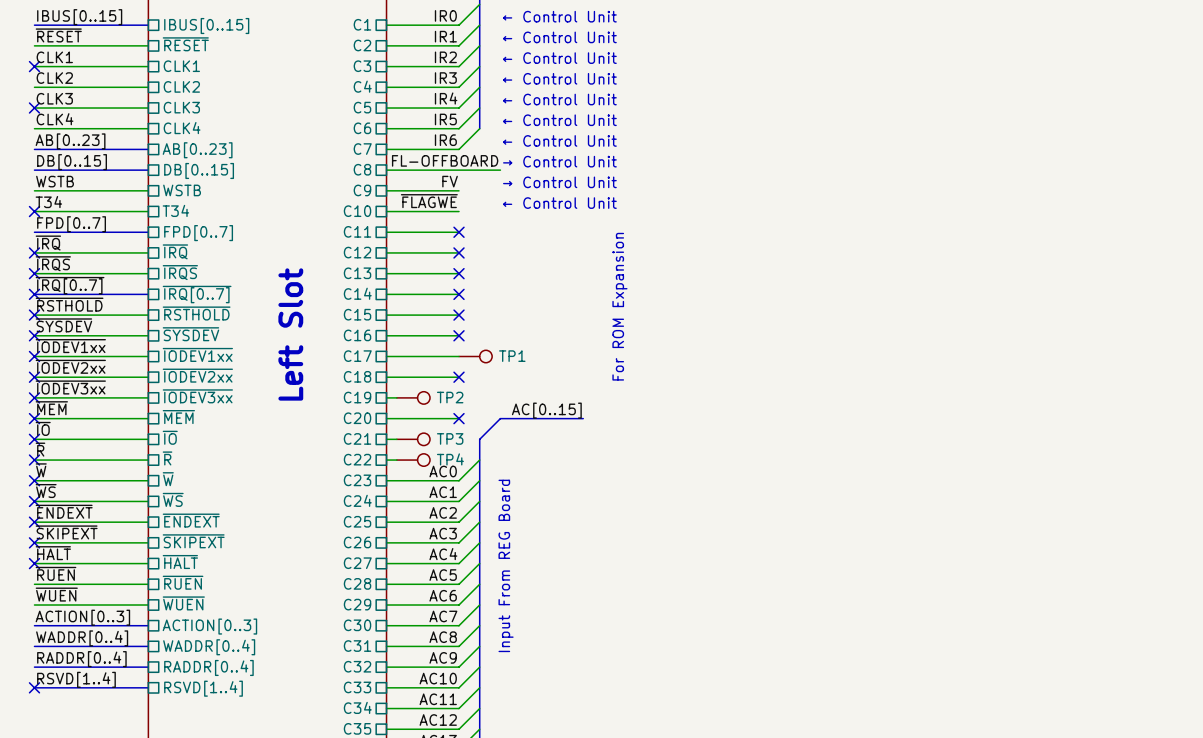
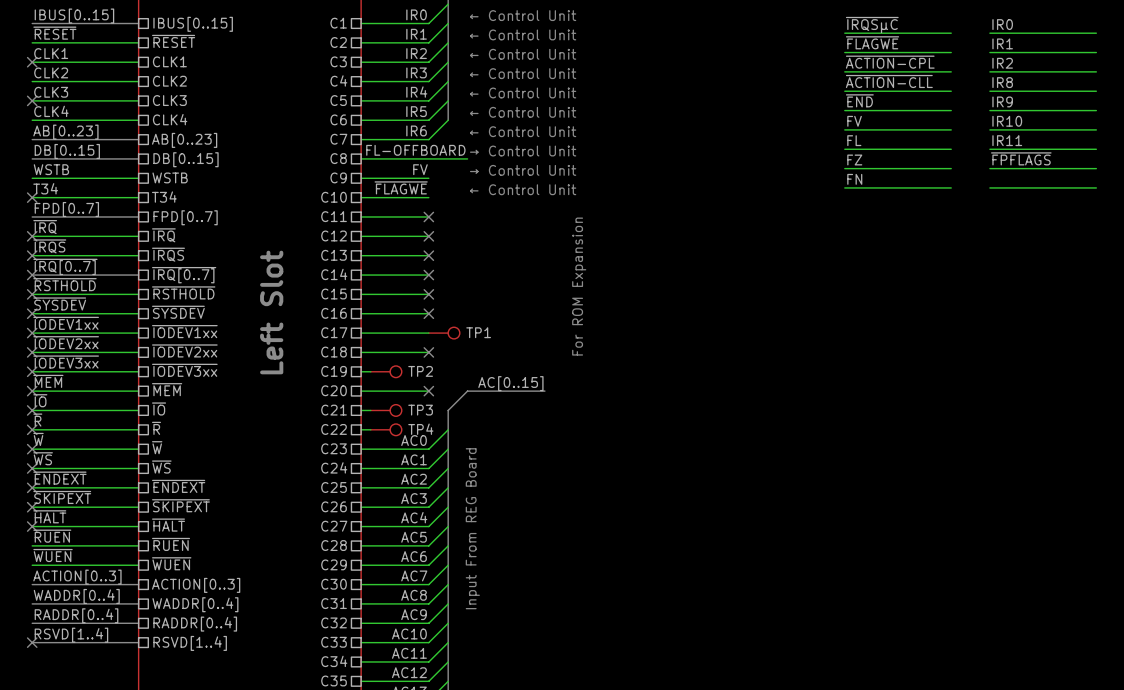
label: none -> ~{IRQSµC} (872, 25)
label: none -> IR0 (1002, 24)
wire: none -> (844, 33) (951, 33)
wire: none -> (989, 33) (1096, 33)
label: none -> ~{FLAGWE} (872, 42)
label: none -> IR1 (1002, 43)
wire: none -> (844, 52) (951, 52)
wire: none -> (989, 52) (1096, 52)
label: none -> ~{ACTION-CPL} (890, 62)
label: none -> IR2 (1002, 63)
wire: none -> (844, 71) (951, 71)
wire: none -> (989, 71) (1096, 71)
label: none -> ~{ACTION-CLL} (889, 81)
label: none -> IR8 (1002, 82)
wire: none -> (844, 91) (951, 91)
wire: none -> (989, 91) (1096, 91)
label: none -> ~{END} (859, 100)
label: none -> IR9 (1002, 101)
wire: none -> (844, 110) (951, 110)
wire: none -> (989, 110) (1096, 110)
label: none -> FV (854, 121)
label: none -> IR10 (1007, 121)
wire: none -> (844, 129) (951, 129)
wire: none -> (989, 129) (1096, 129)
label: none -> FL (854, 140)
label: none -> IR11 (1007, 140)
wire: none -> (844, 149) (951, 149)
wire: none -> (989, 149) (1096, 149)
label: none -> ~{FPFLAGS} (1021, 158)
label: none -> FZ (854, 159)
wire: none -> (844, 168) (951, 168)
wire: none -> (989, 168) (1096, 168)
label: none -> FN (854, 179)
wire: none -> (844, 187) (951, 187)
wire: none -> (989, 187) (1096, 187)

